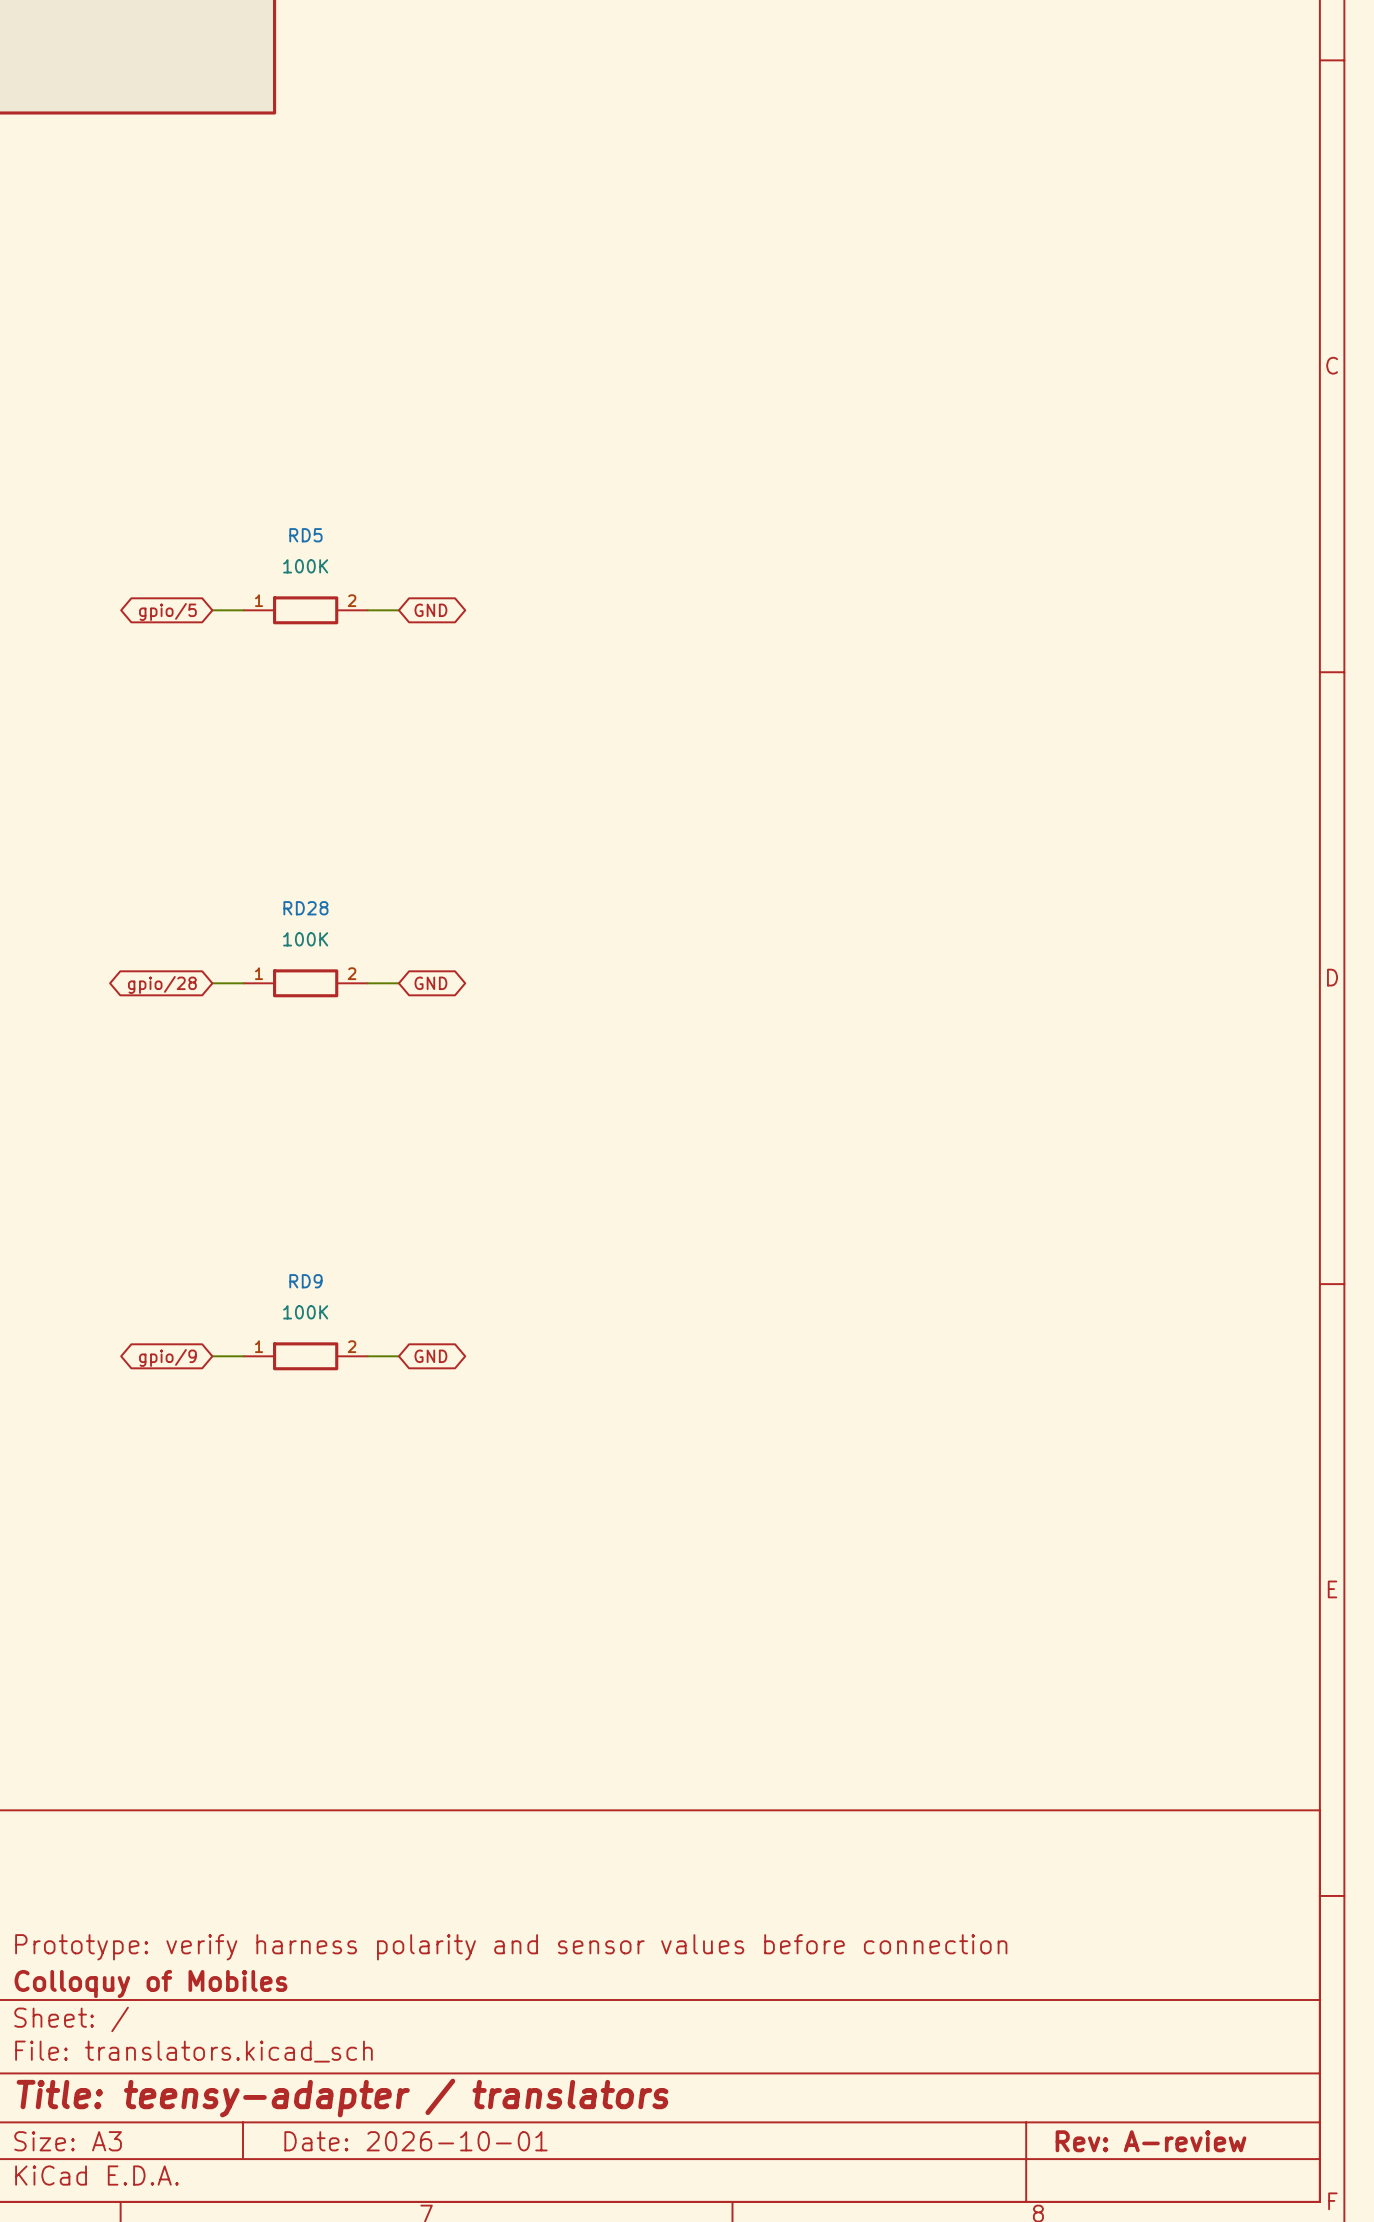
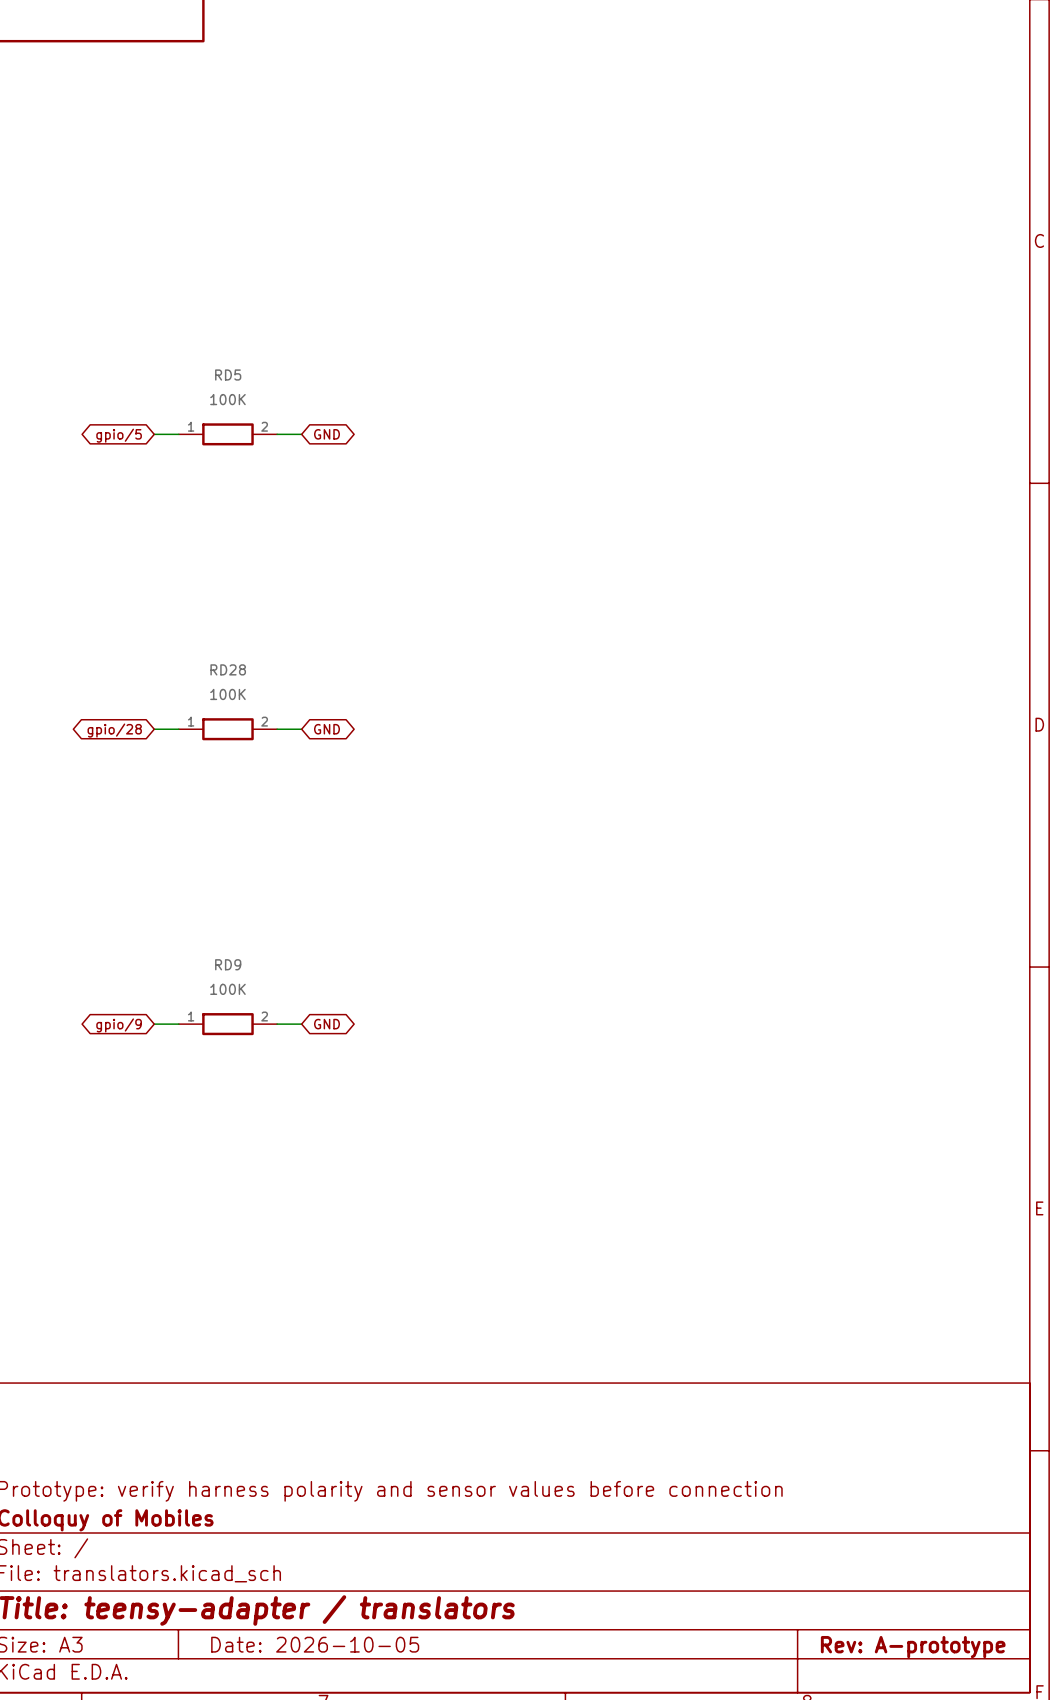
title block: Date: 2026-10-01 (415, 2141) -> Date: 2026-10-05 (315, 1644)
title block: Rev: A-review (1150, 2141) -> Rev: A-prototype (913, 1647)

